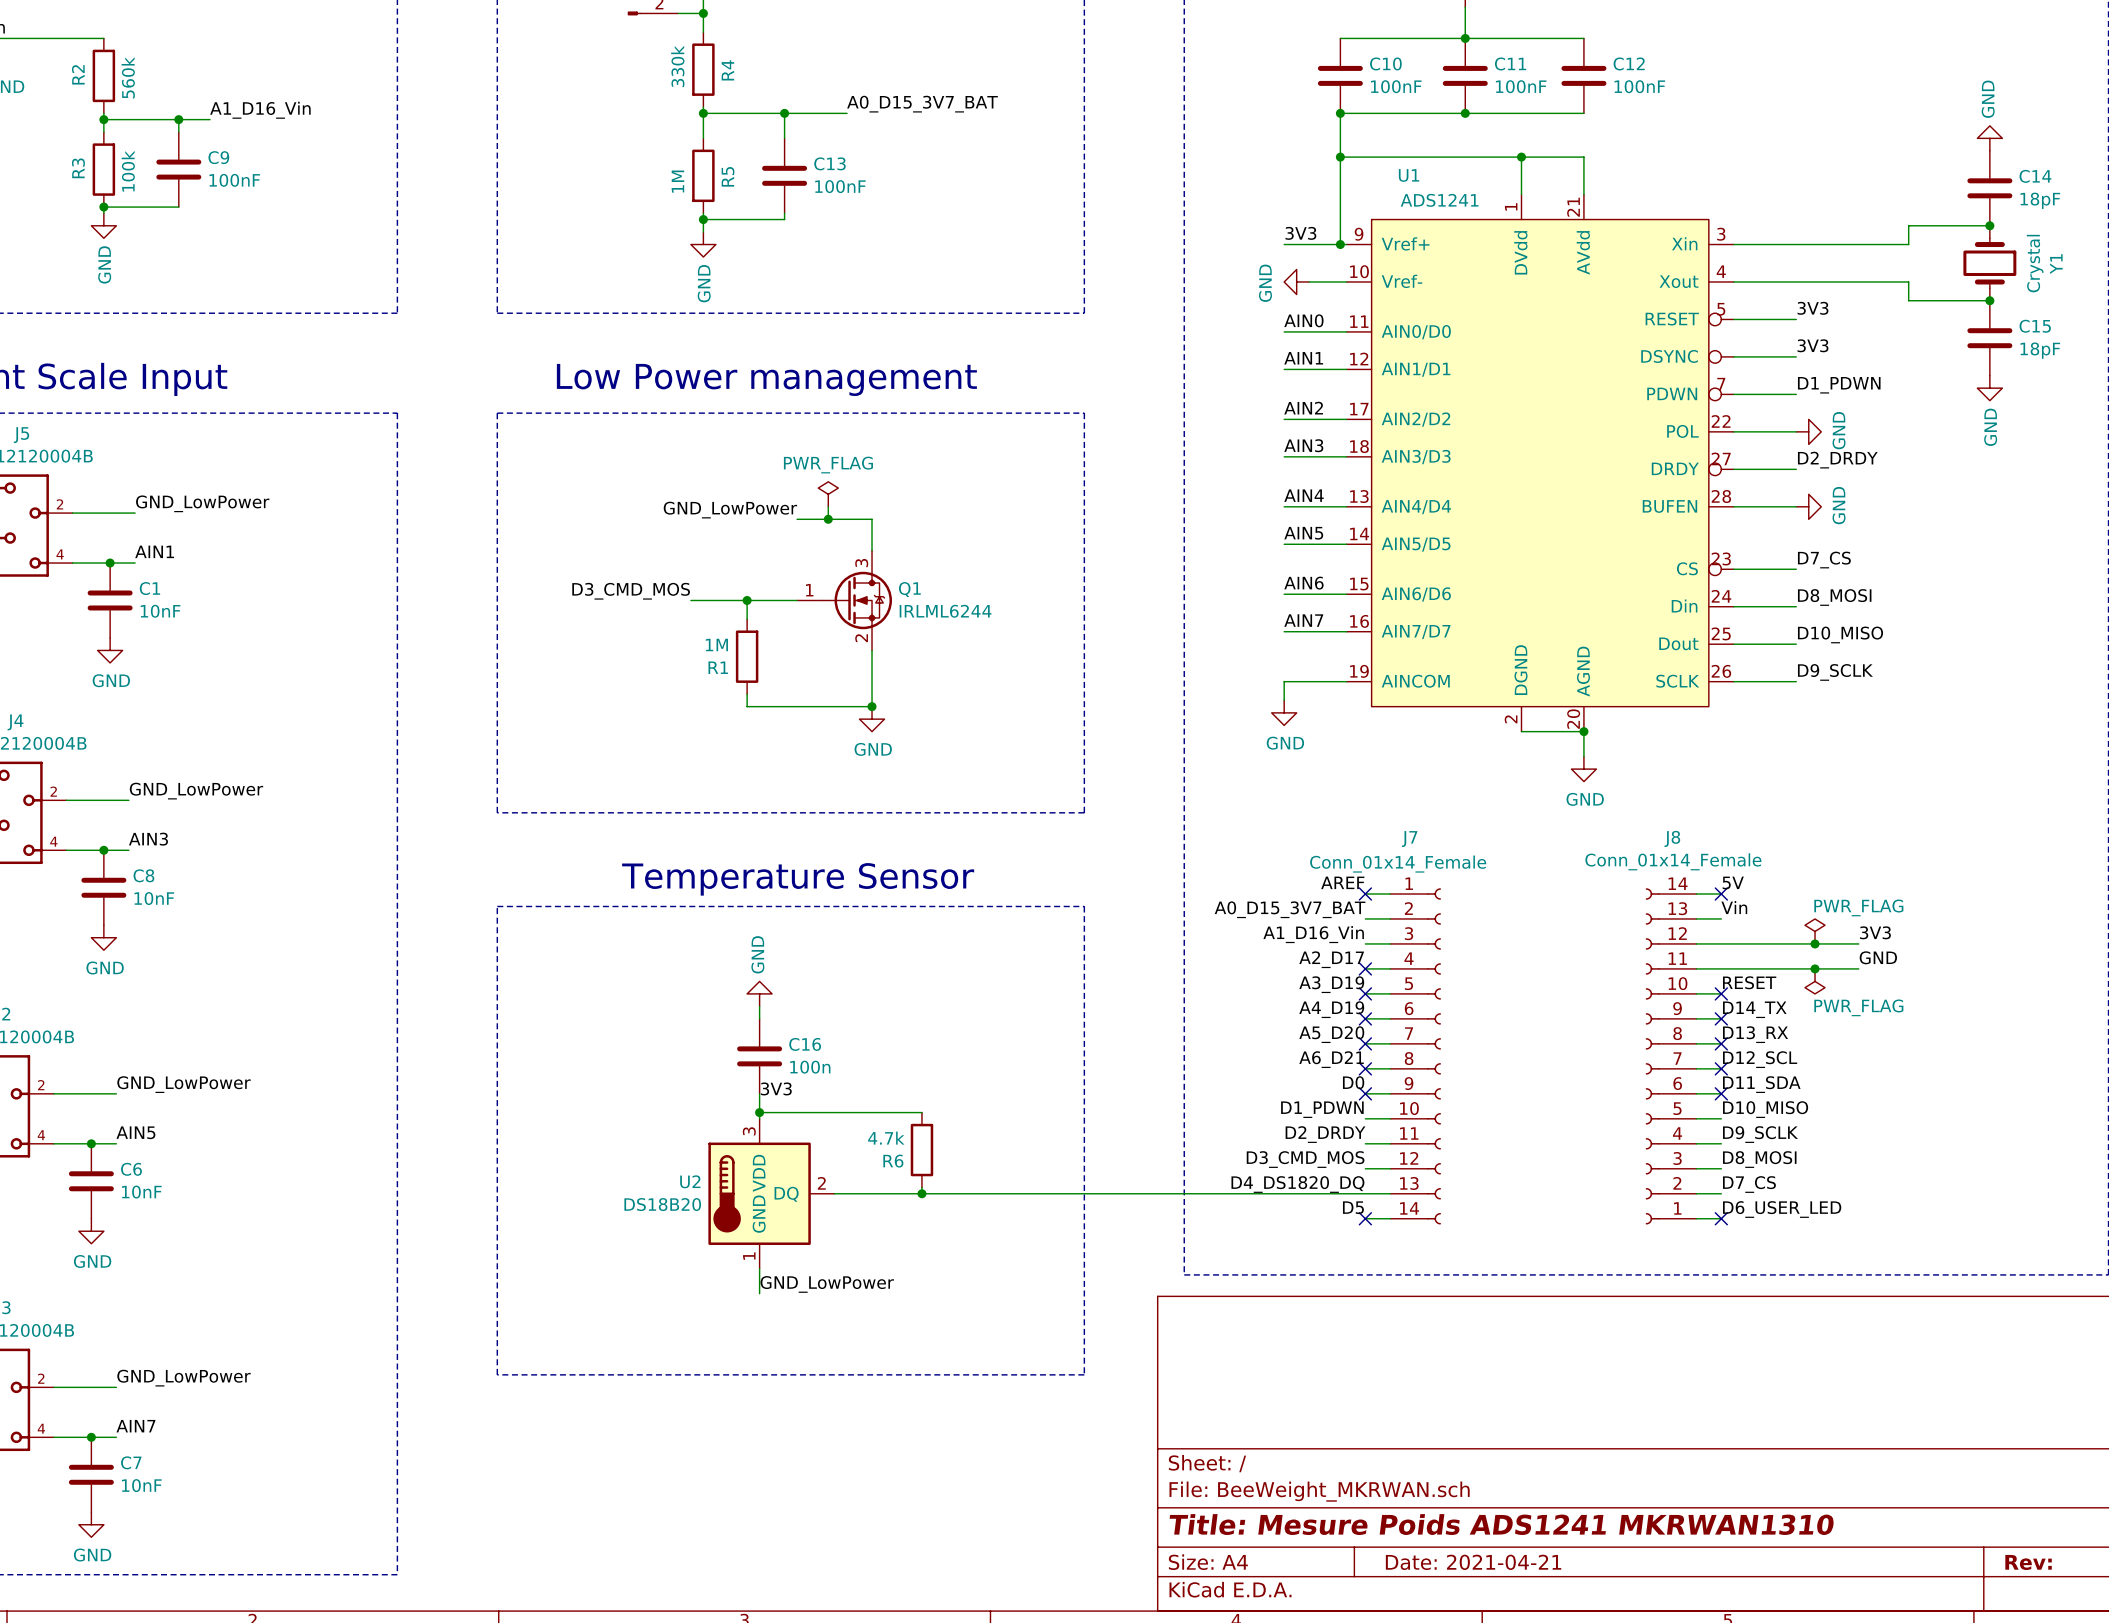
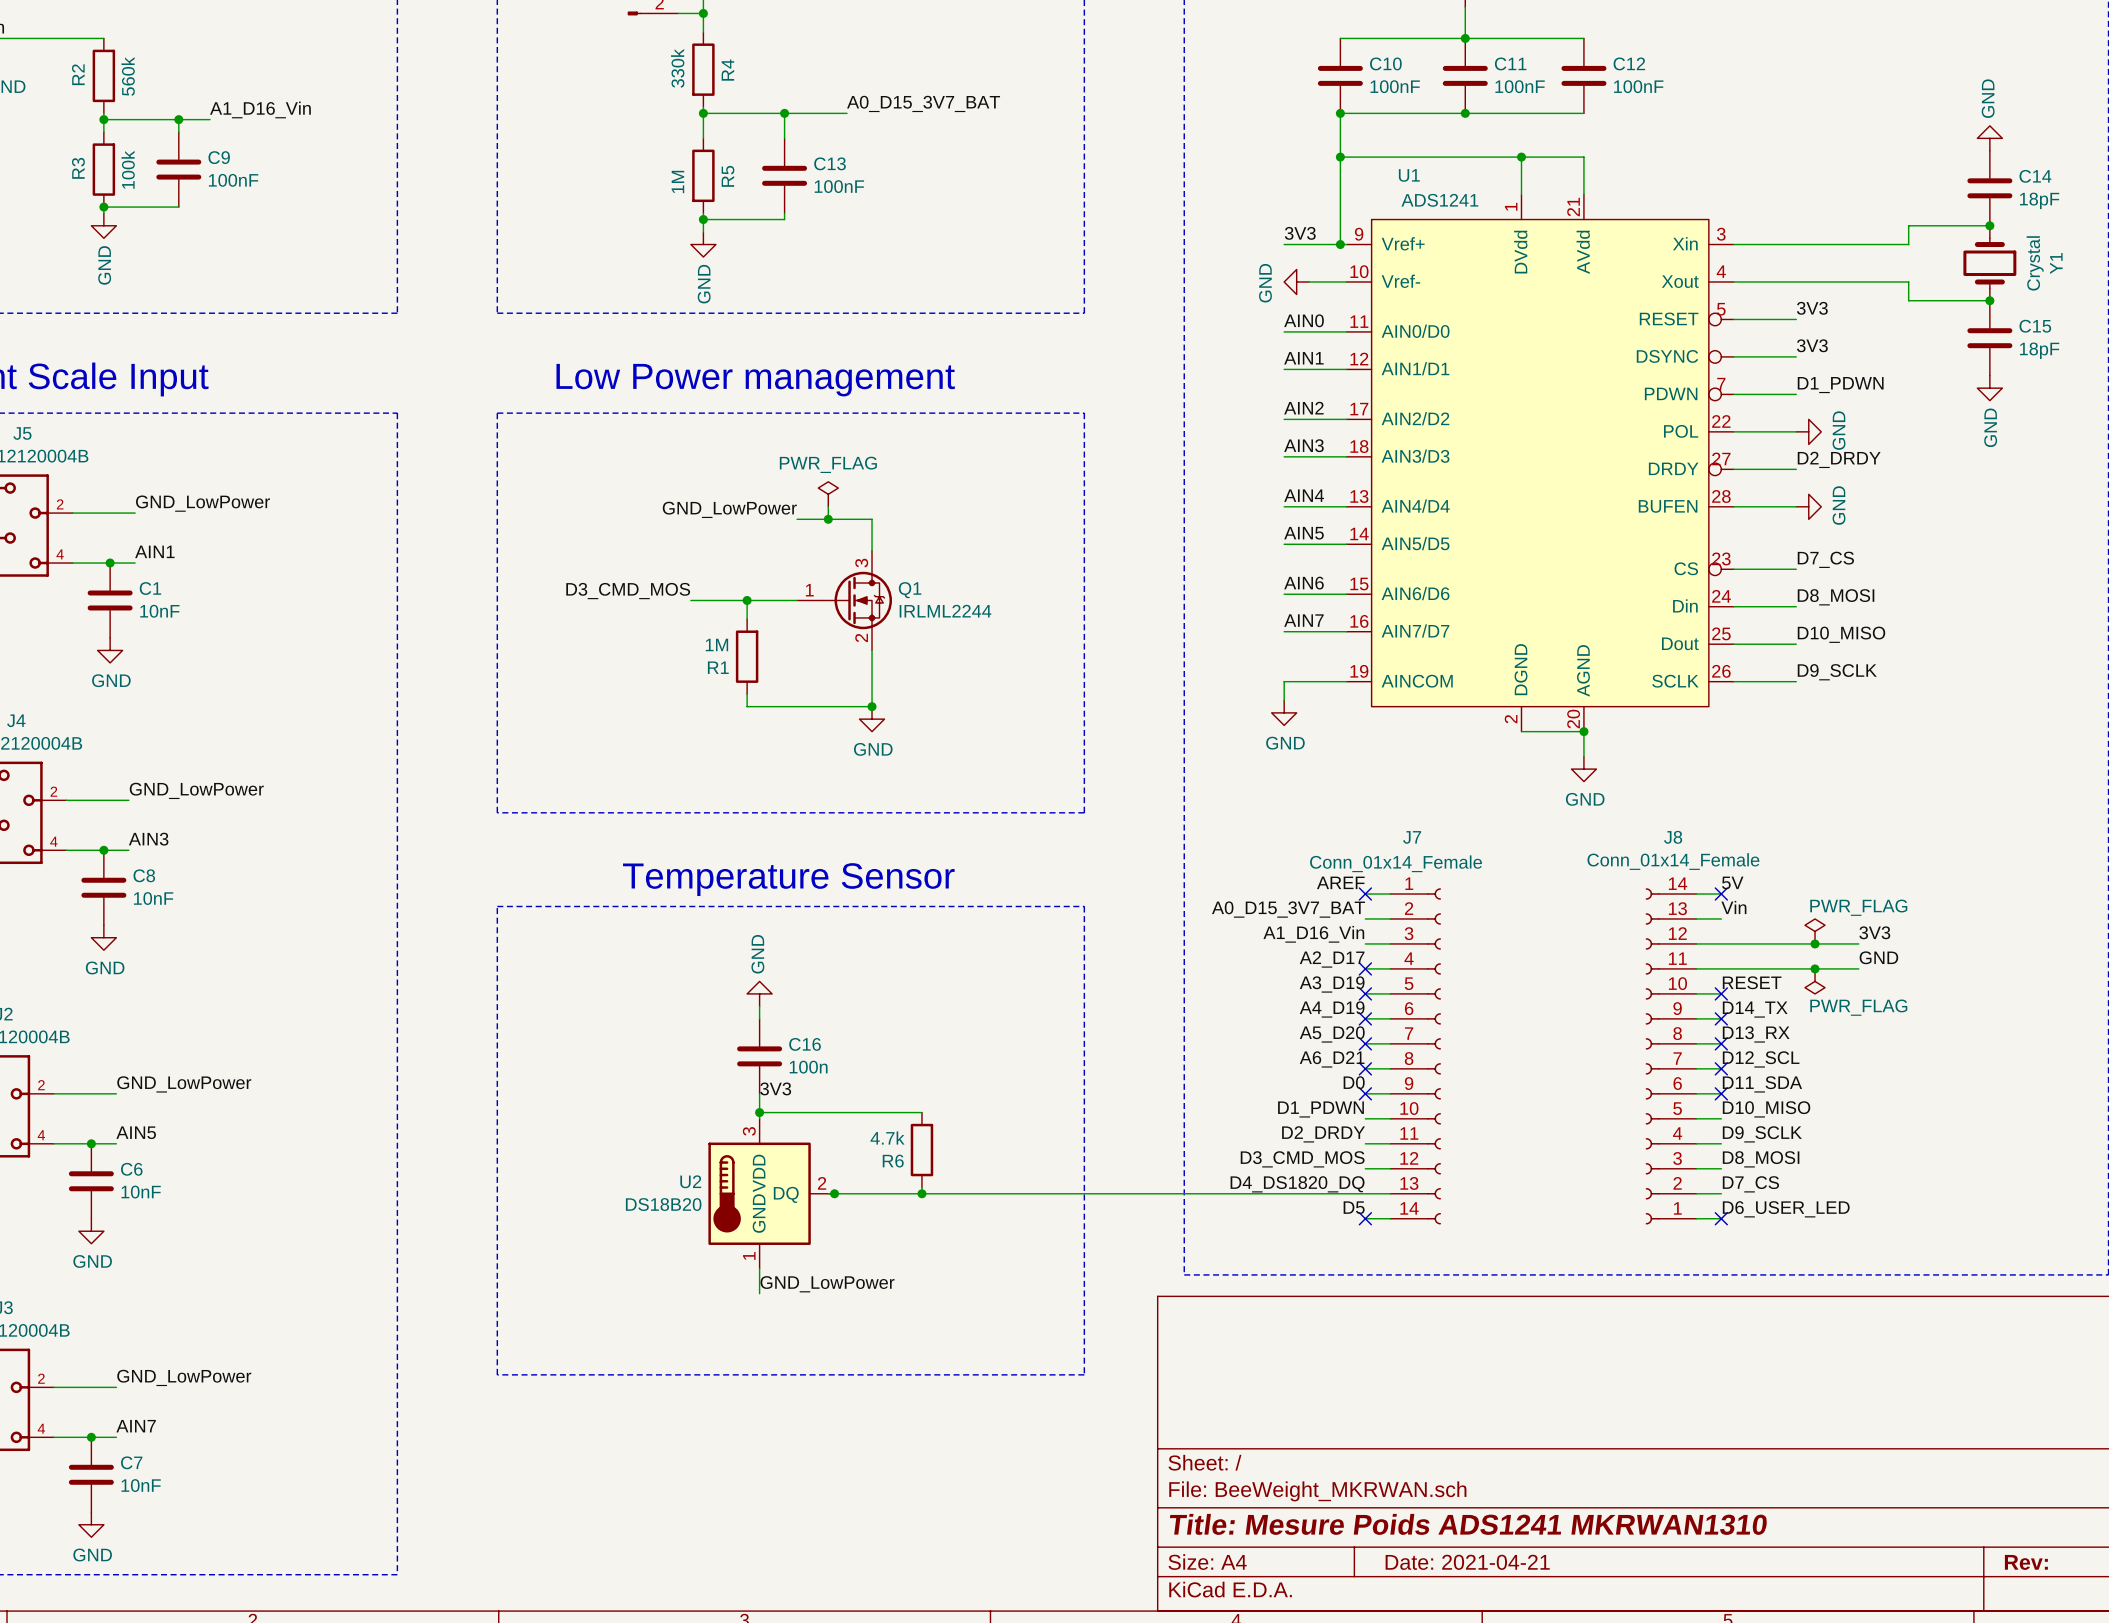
Q1 value: IRLML6244 (945, 611) -> IRLML2244 (945, 611)
junction: none -> (834, 1193)

